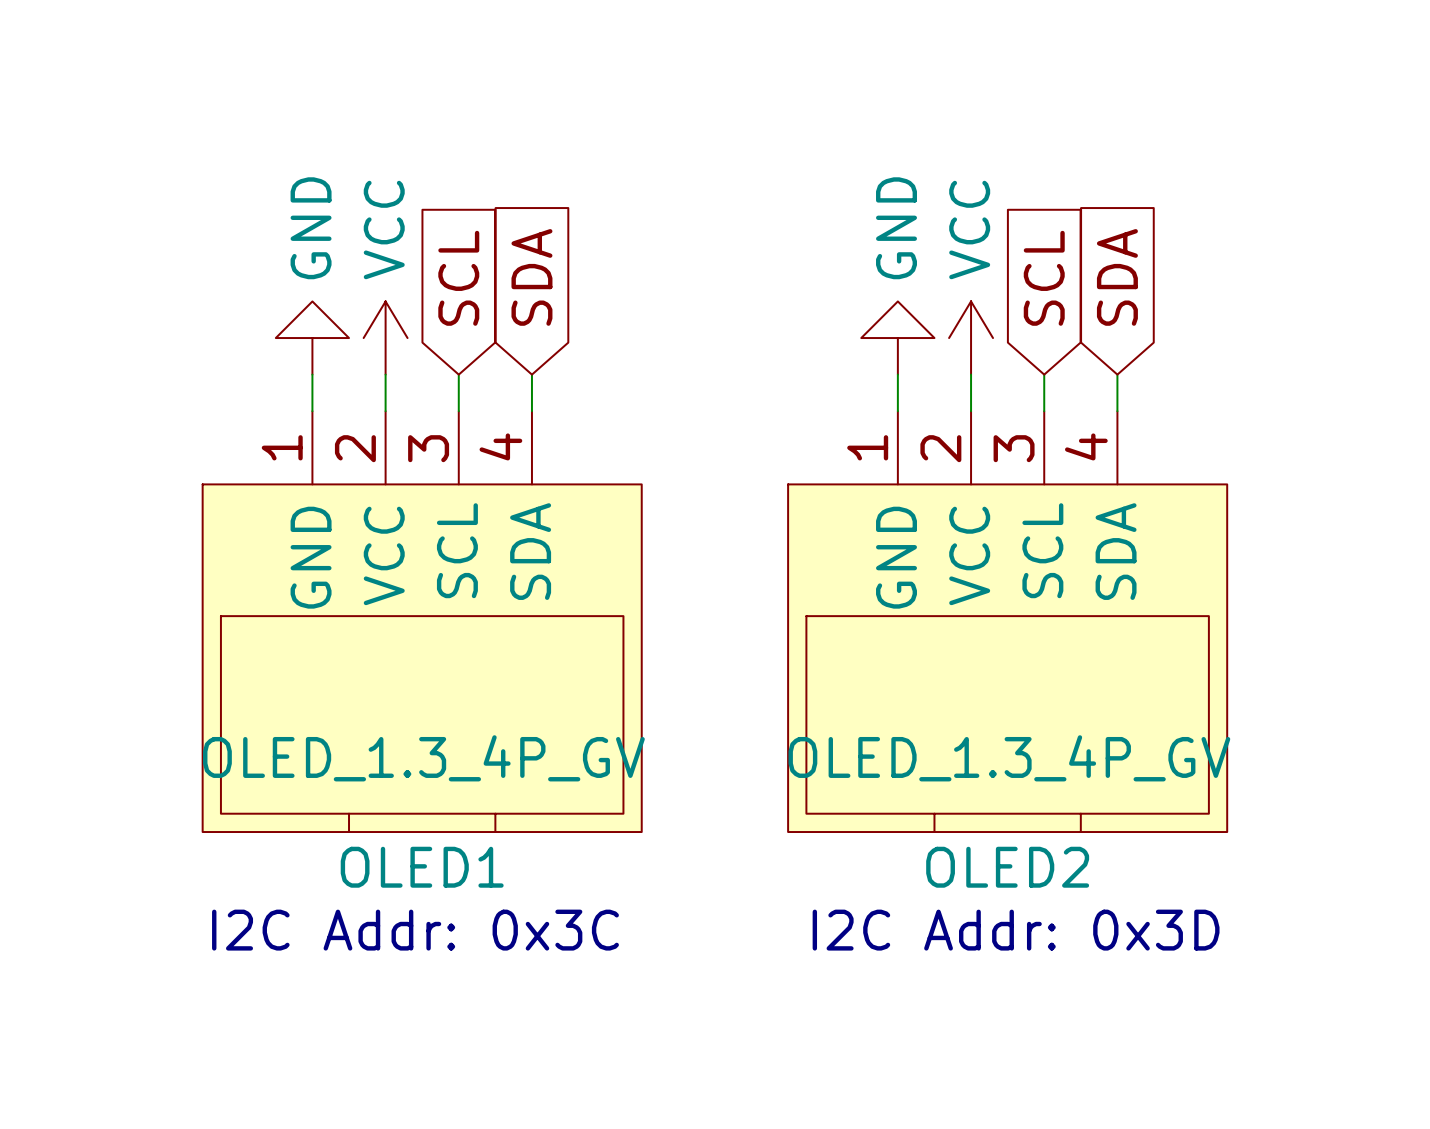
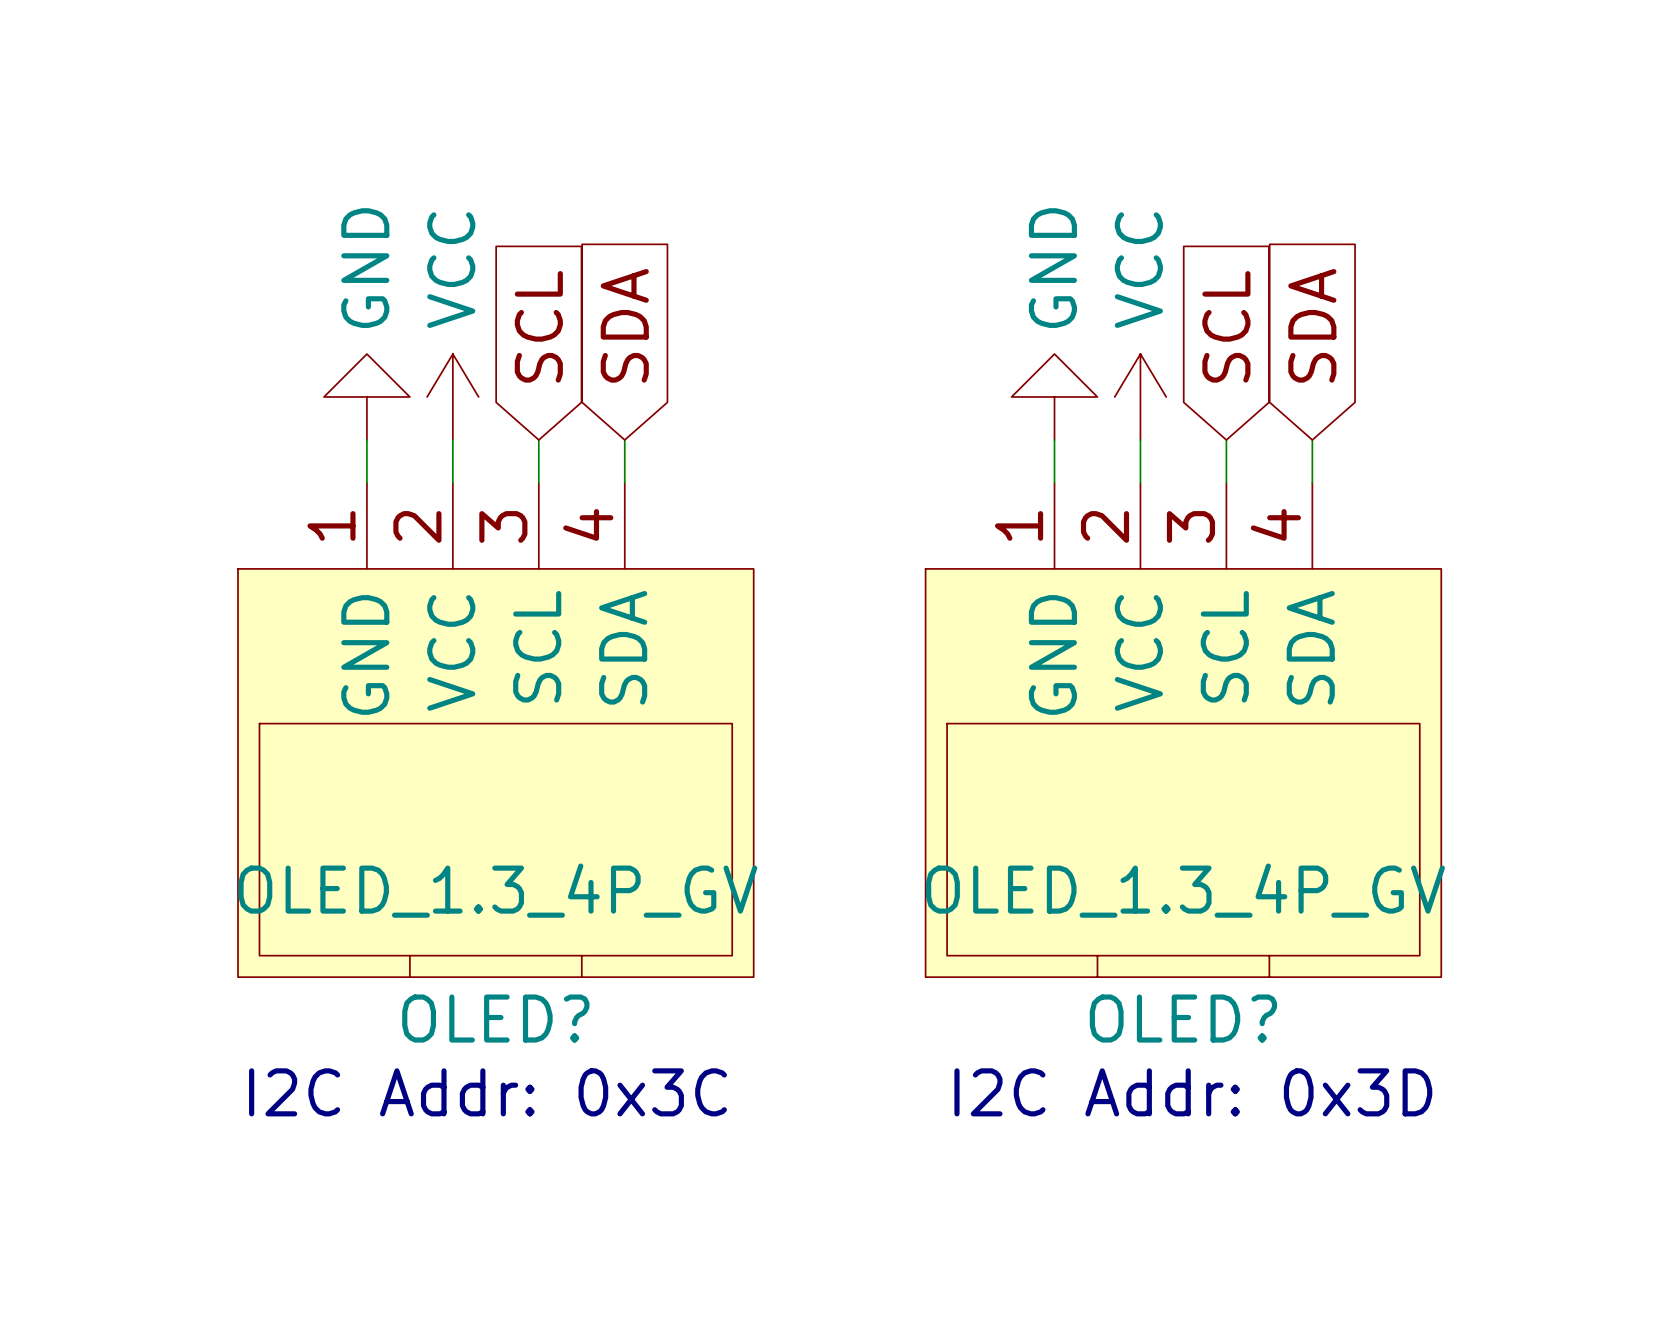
OLED1 name: OLED1 (422, 867) -> OLED? (495, 1018)
OLED2 name: OLED2 (1007, 867) -> OLED? (1183, 1018)

